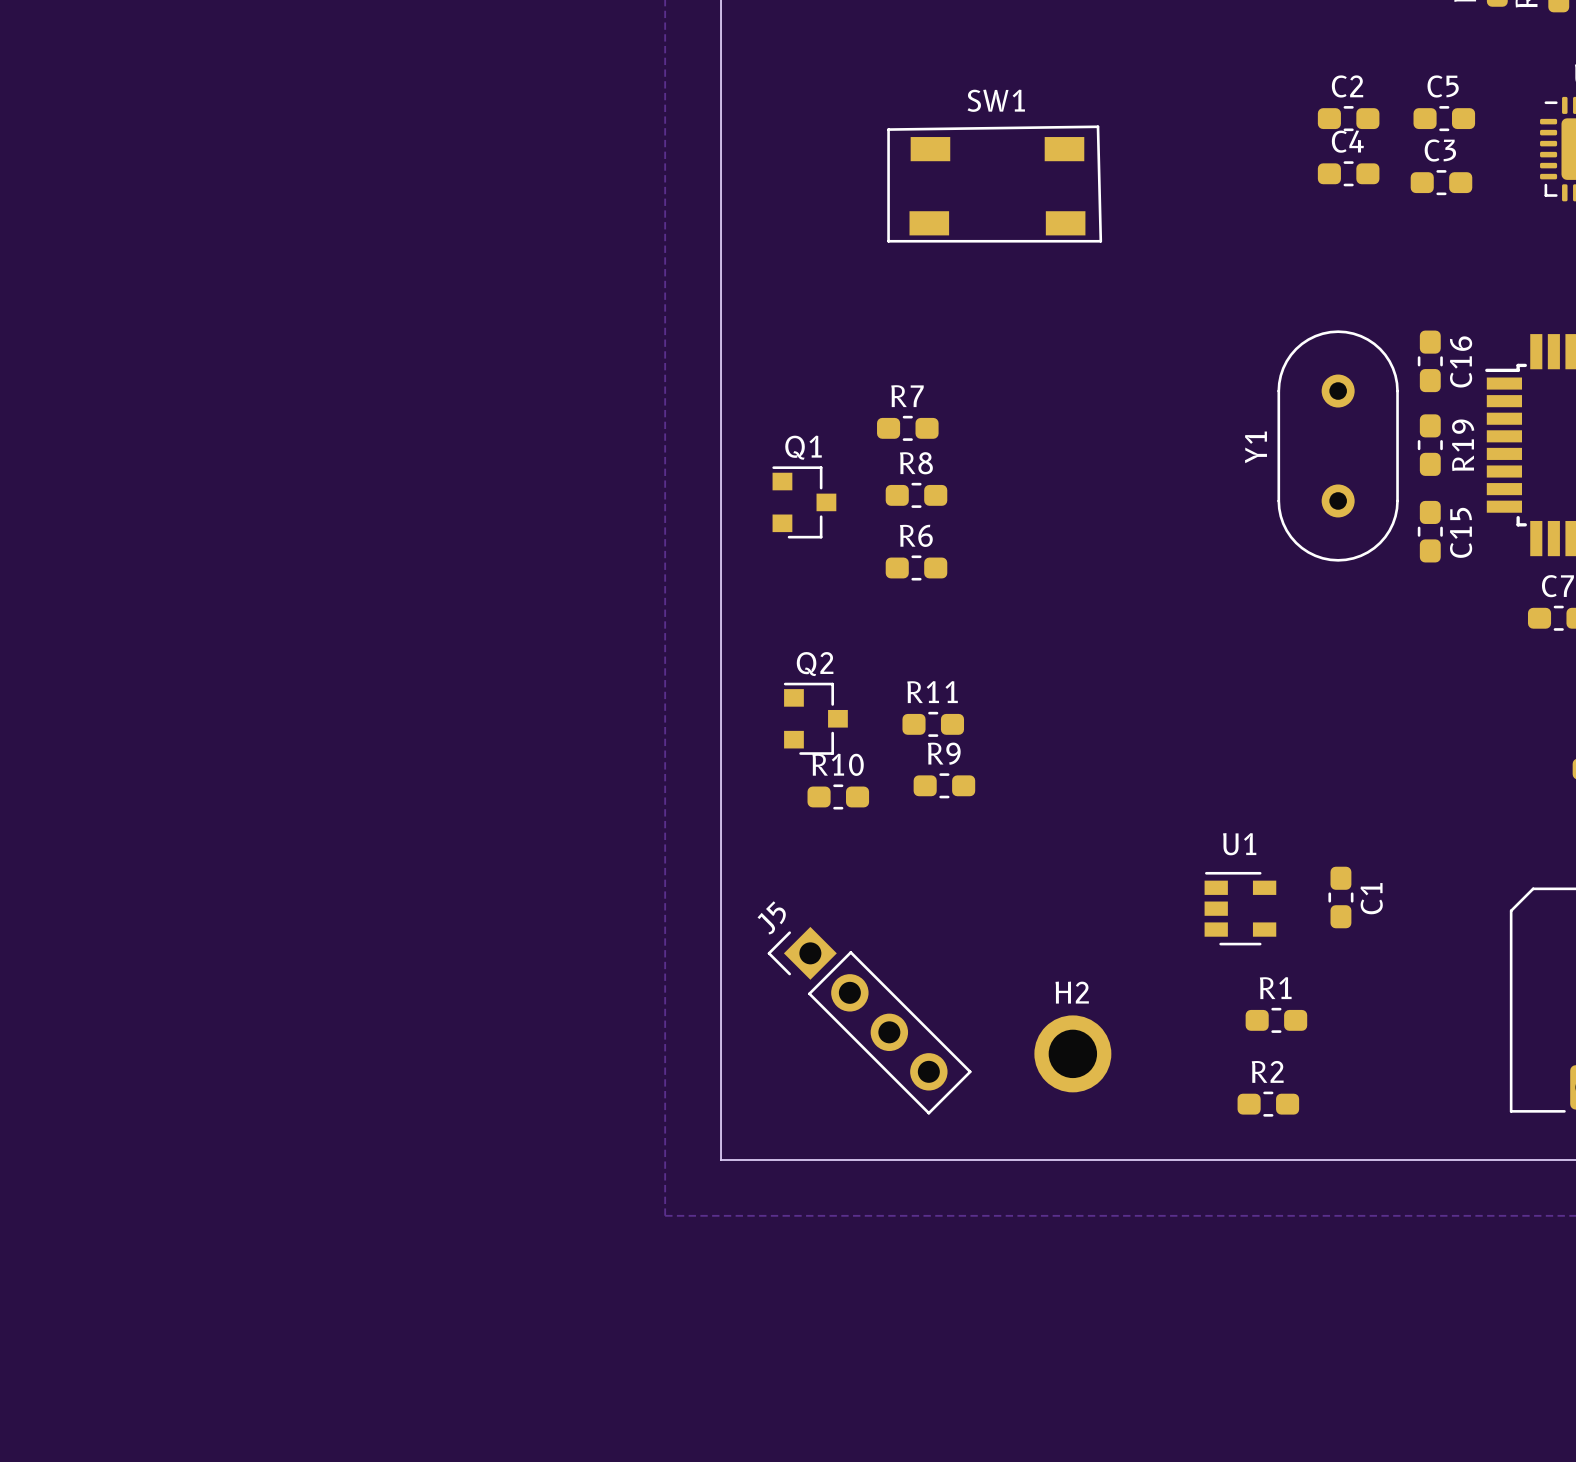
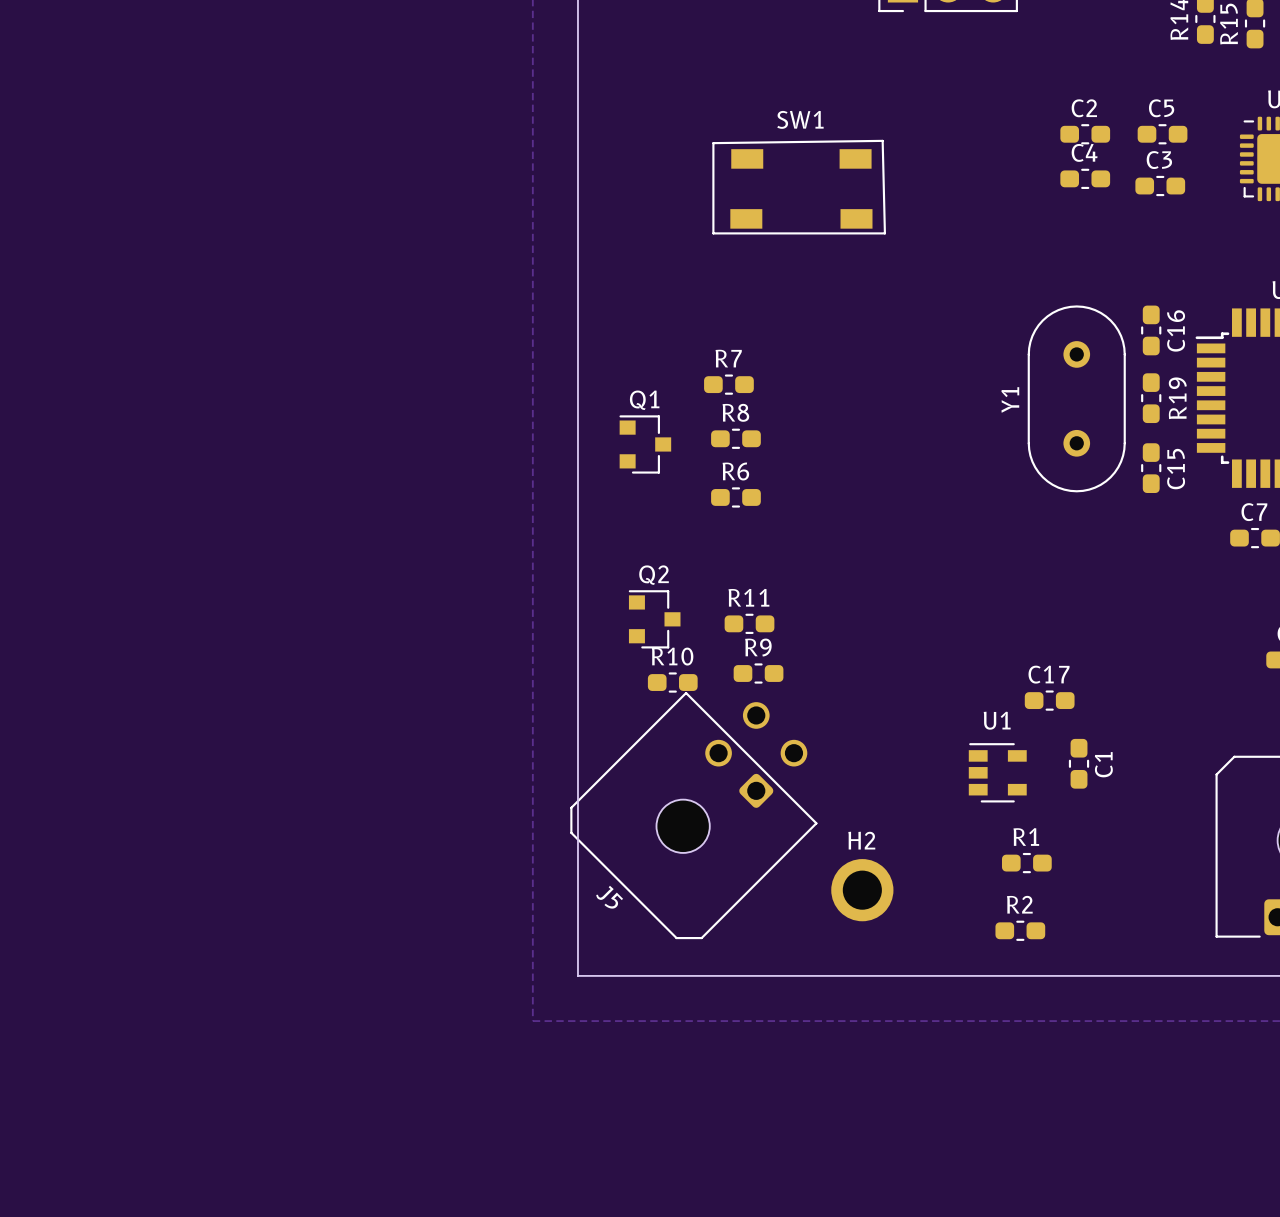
C17: none -> (1049, 700)
J5 name position: J5 (771, 917) -> J5 (609, 897)
J5 footprint: [767, 926, 972, 1115] -> [570, 691, 818, 940]

